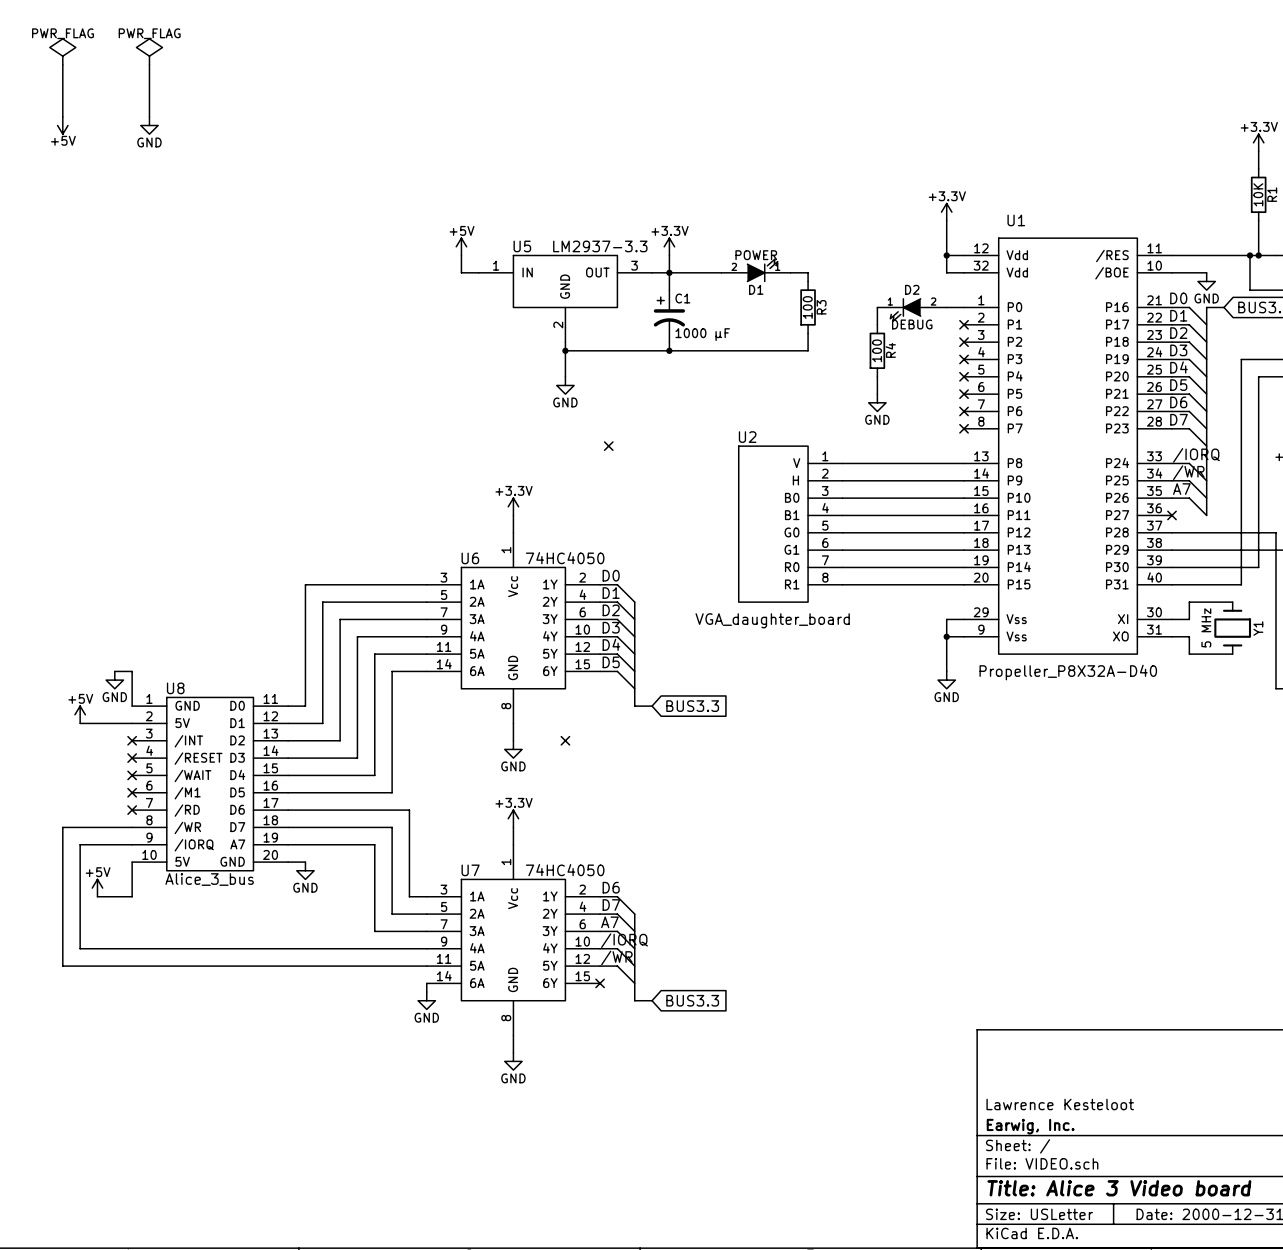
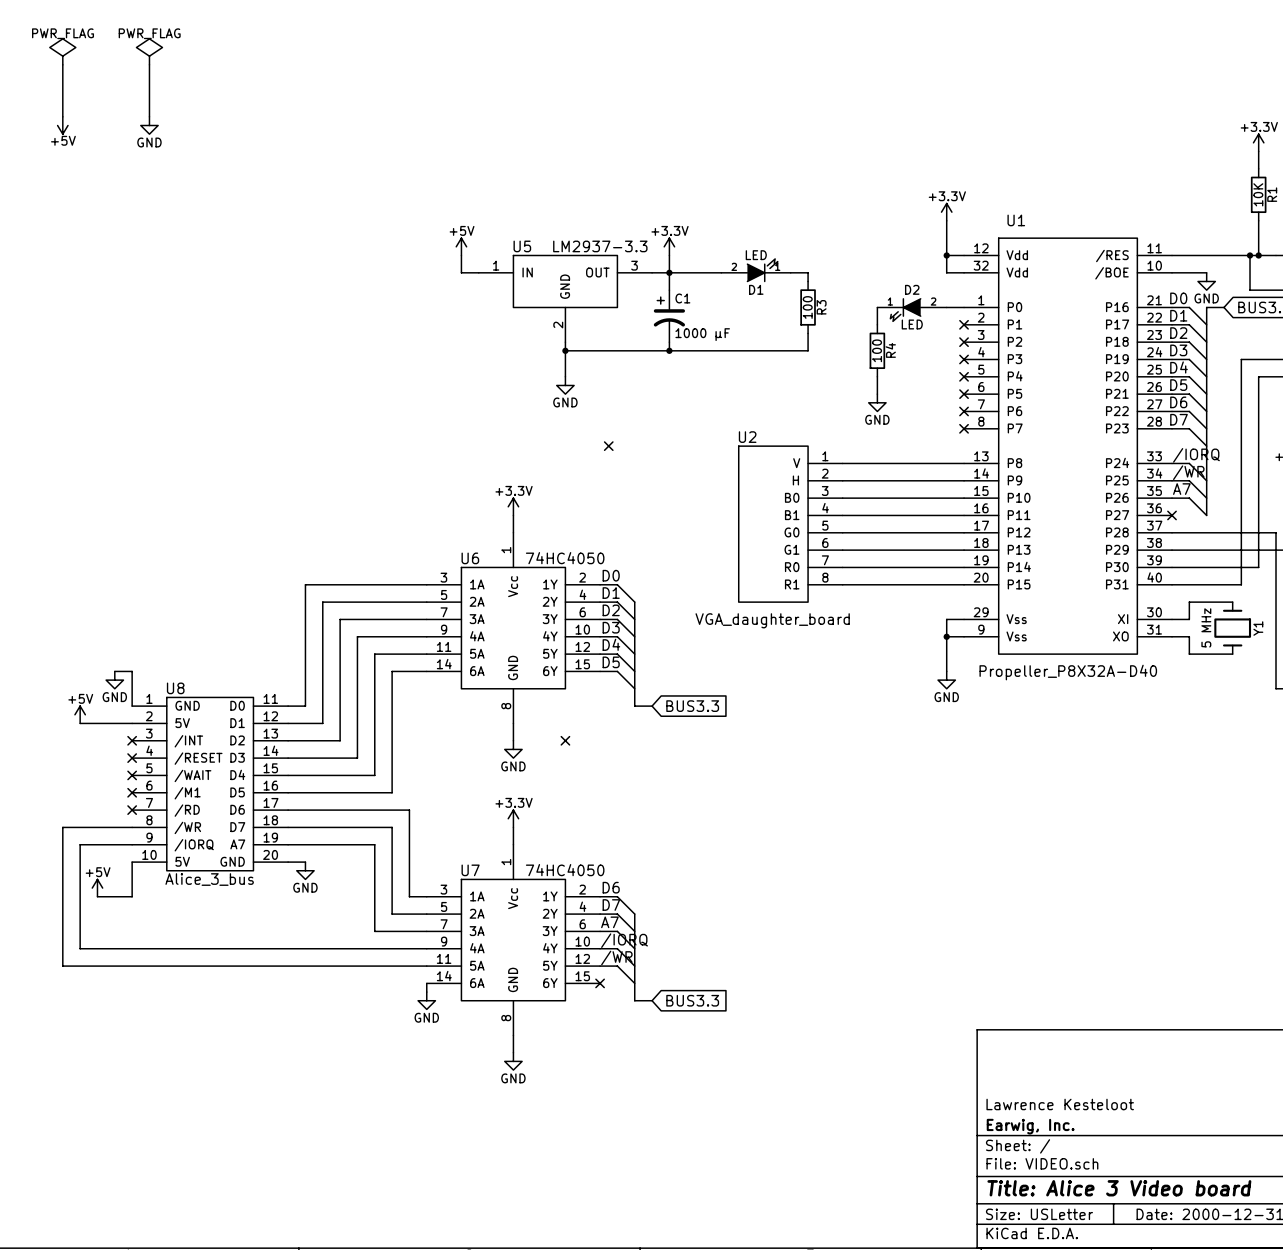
D1 value: POWER (756, 255) -> LED (756, 255)
D2 value: DEBUG (912, 324) -> LED (912, 324)

